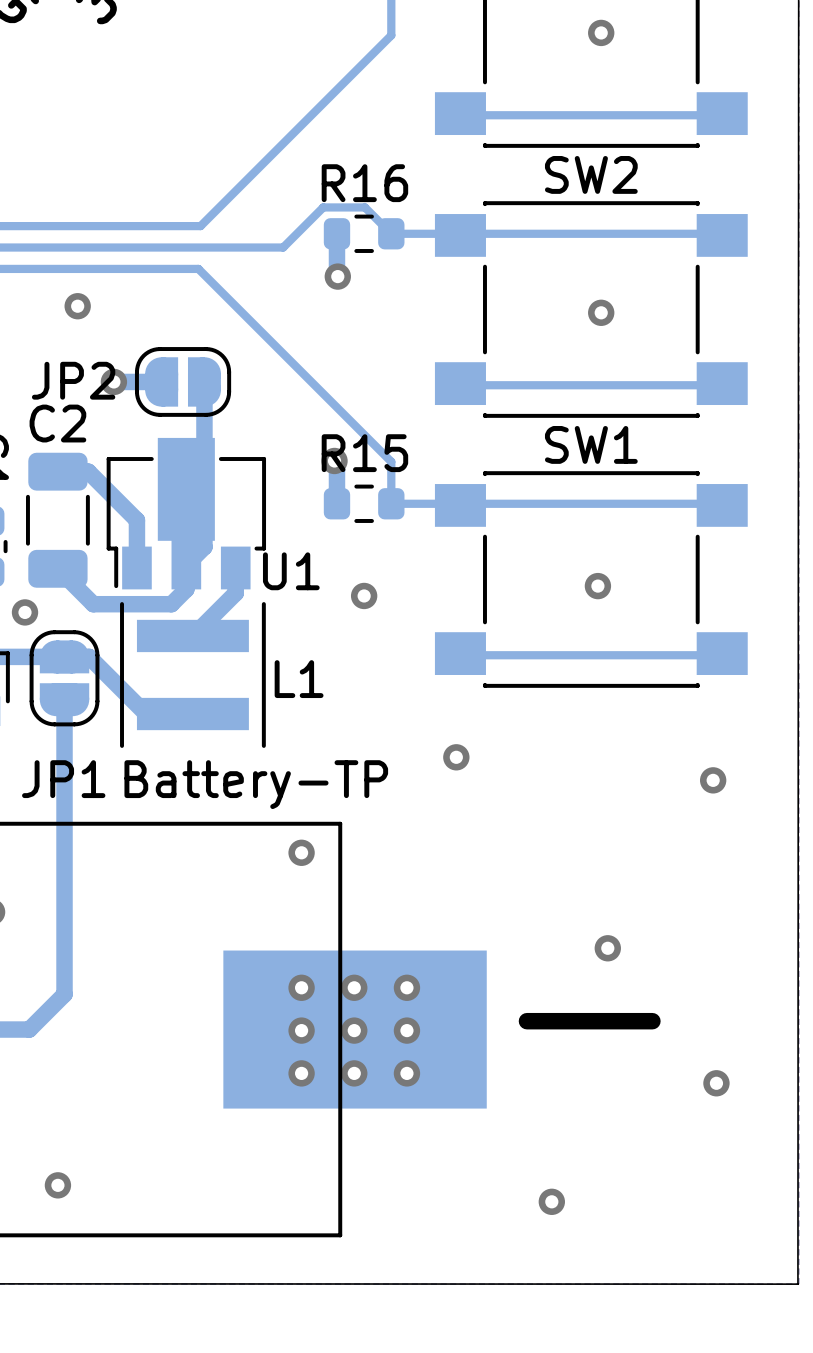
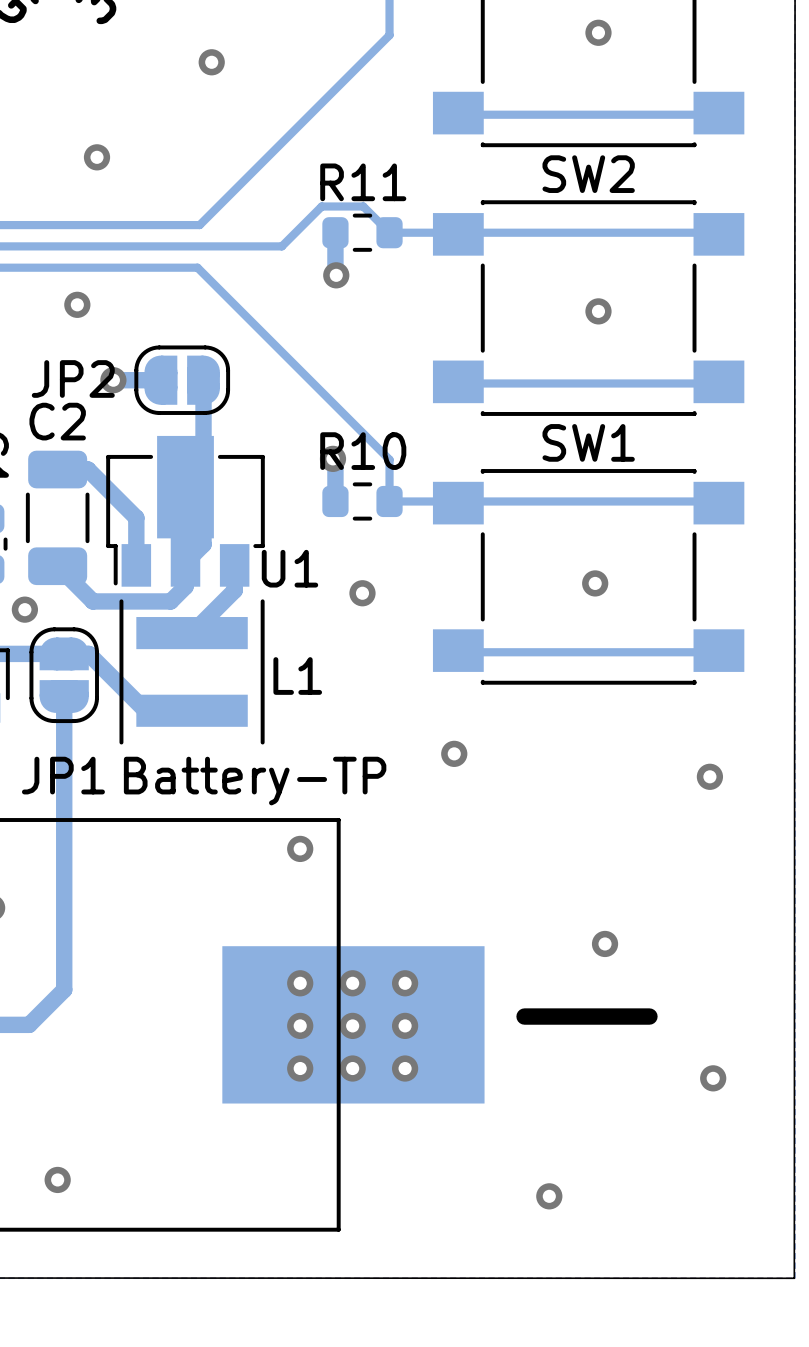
via: none -> (211, 62)
via: none -> (97, 157)
R16 name: R16 (364, 183) -> R11 (363, 182)
R15 name: R15 (364, 453) -> R10 (363, 451)

